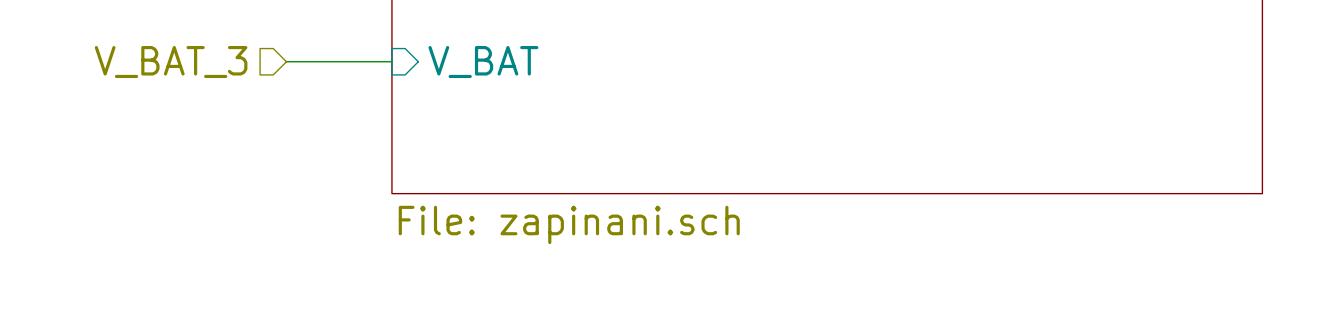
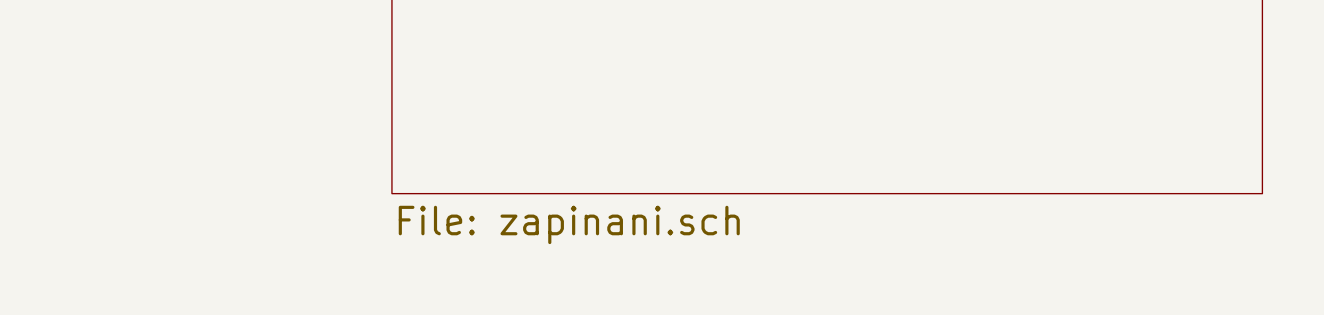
wire: (286, 61) (391, 61) -> none
hierarchical label: V_BAT_3 (171, 62) -> none
sheet pin: V_BAT (483, 62) -> none

